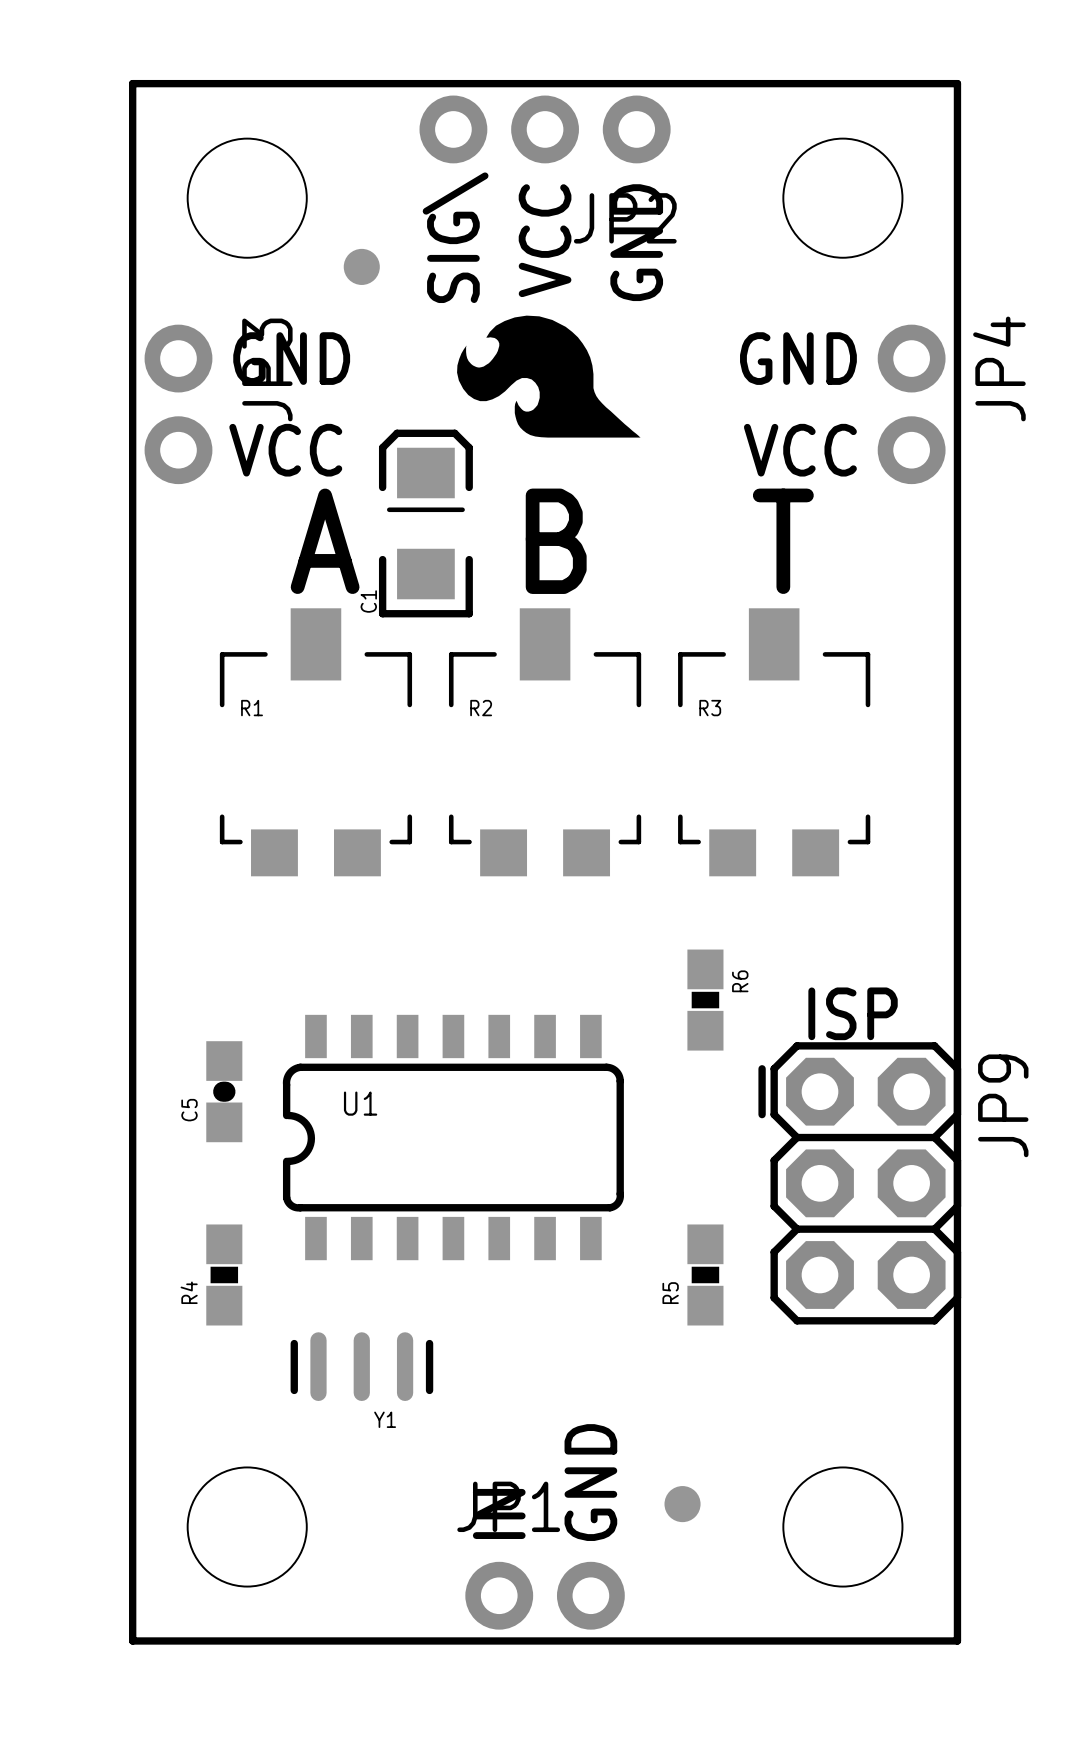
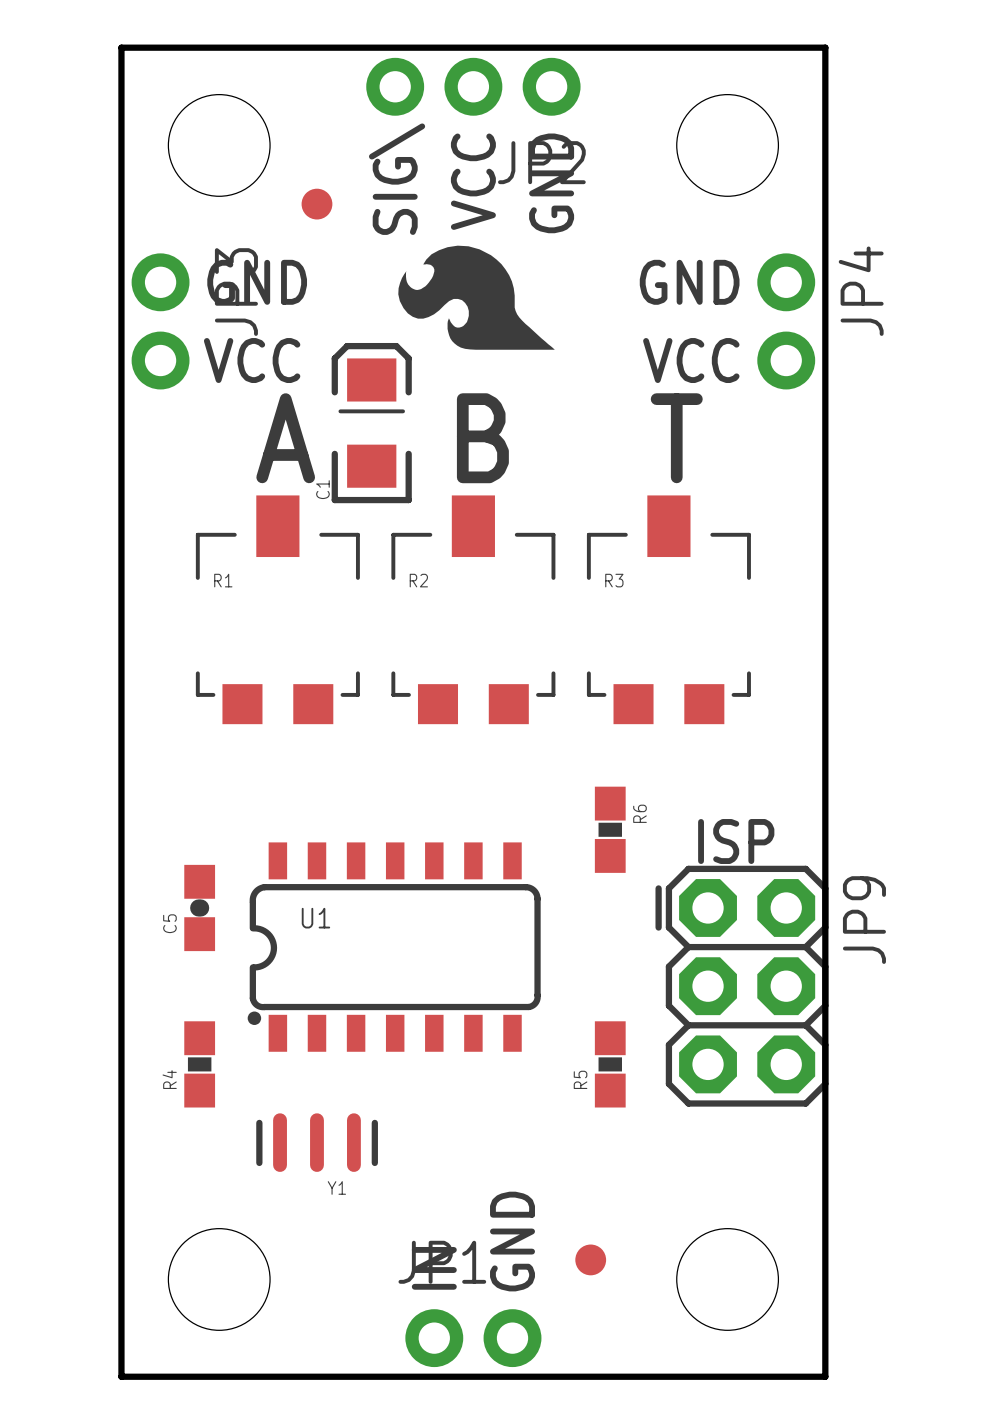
U1 footprint: [282, 1014, 625, 1261] -> [247, 842, 541, 1052]

